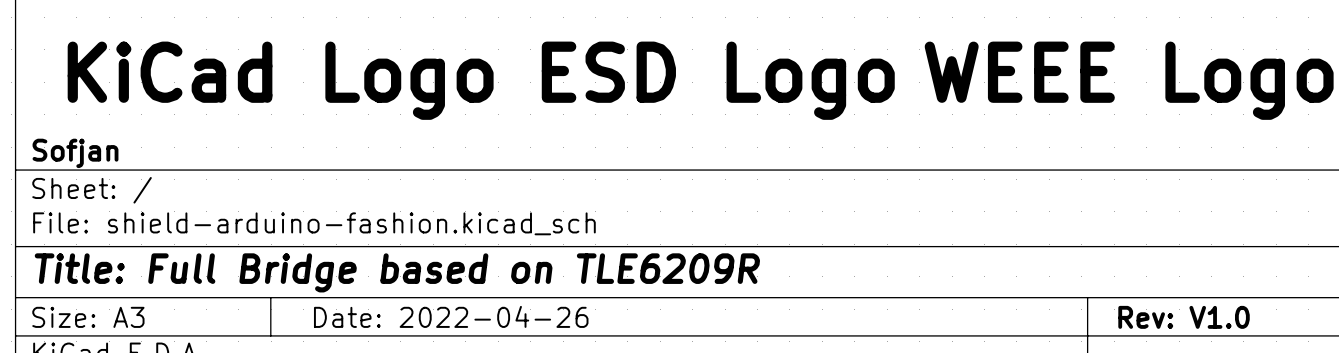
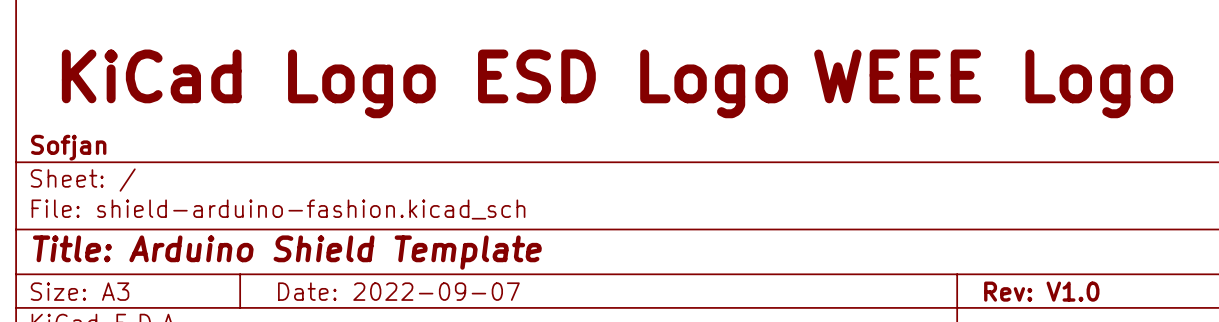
title block: Title: Full Bridge based on TLE6209R (397, 272) -> Title: Arduino Shield Template (287, 252)
title block: Date: 2022-04-26 (451, 316) -> Date: 2022-09-07 (398, 291)

